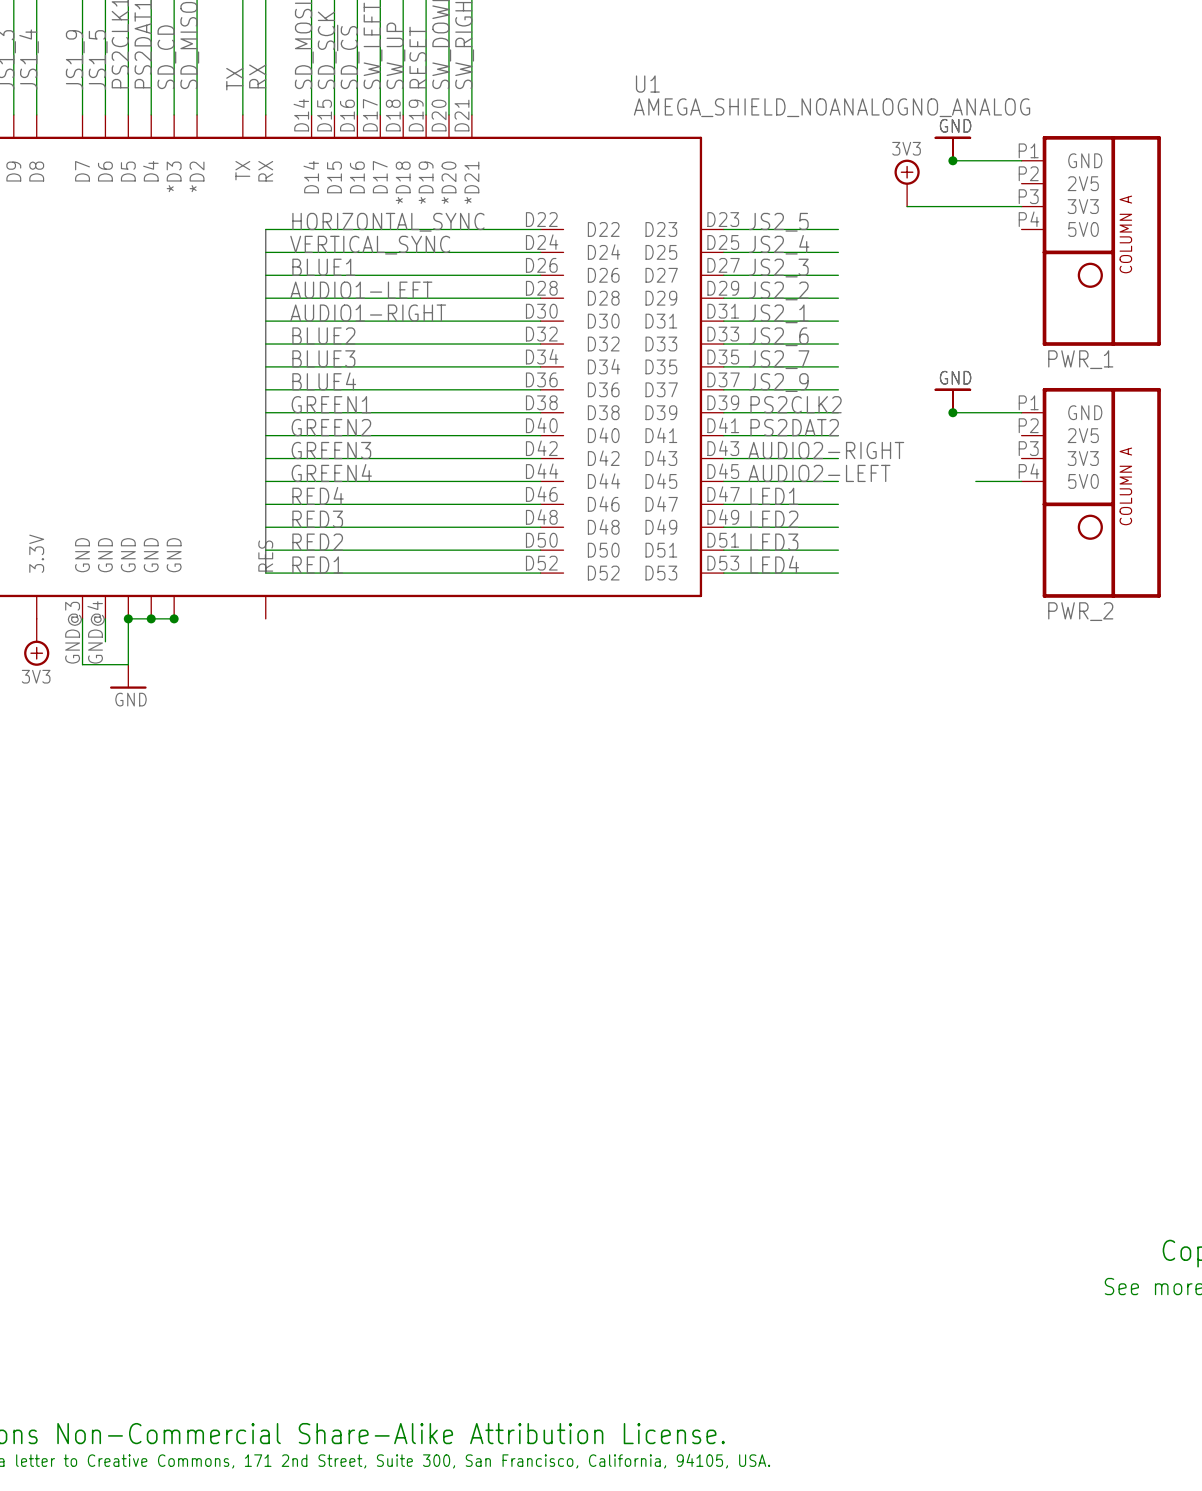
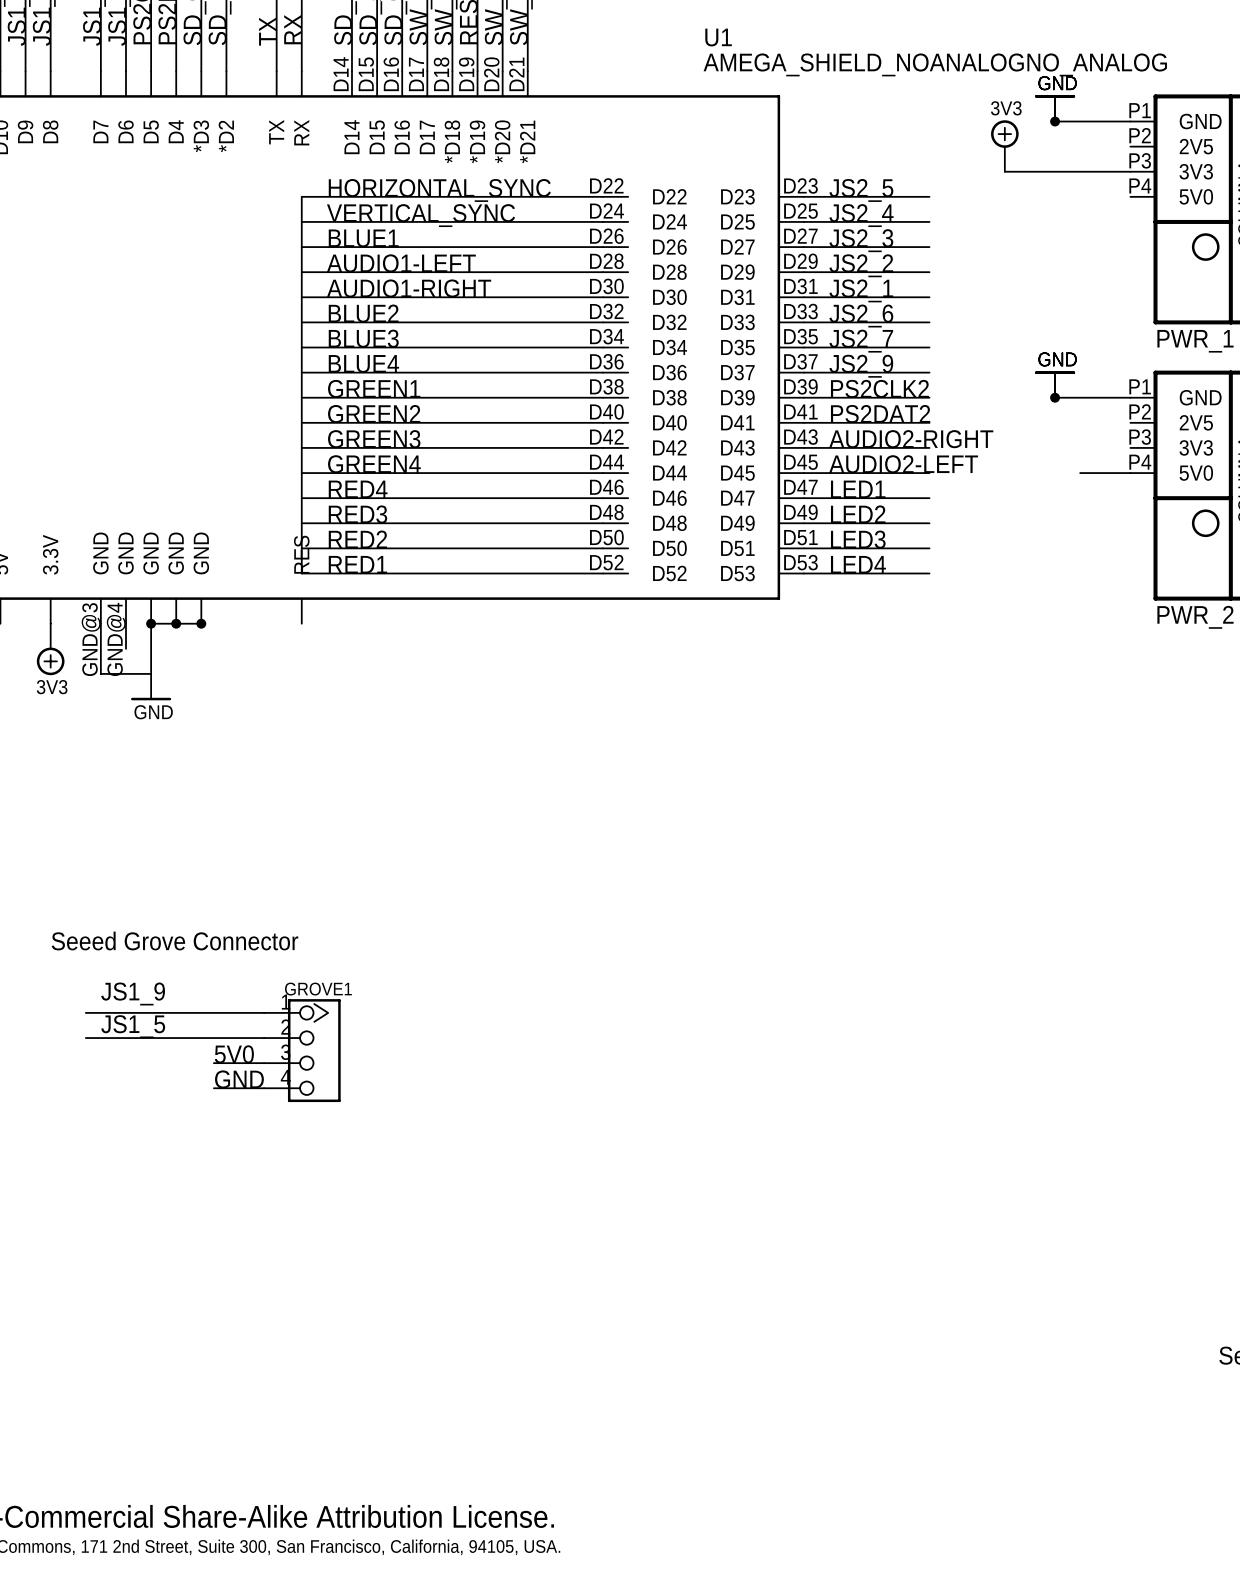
text: none -> Seeed Grove Connector (174, 941)
label: none -> JS1_9 (133, 993)
wire: none -> (85, 1012) (264, 1012)
label: none -> JS1_5 (133, 1026)
wire: none -> (85, 1038) (264, 1038)
GROVE1: none -> (302, 1050)
label: none -> 5V0 (234, 1054)
wire: none -> (213, 1063) (264, 1063)
label: none -> GND (239, 1079)
wire: none -> (213, 1088) (264, 1088)

